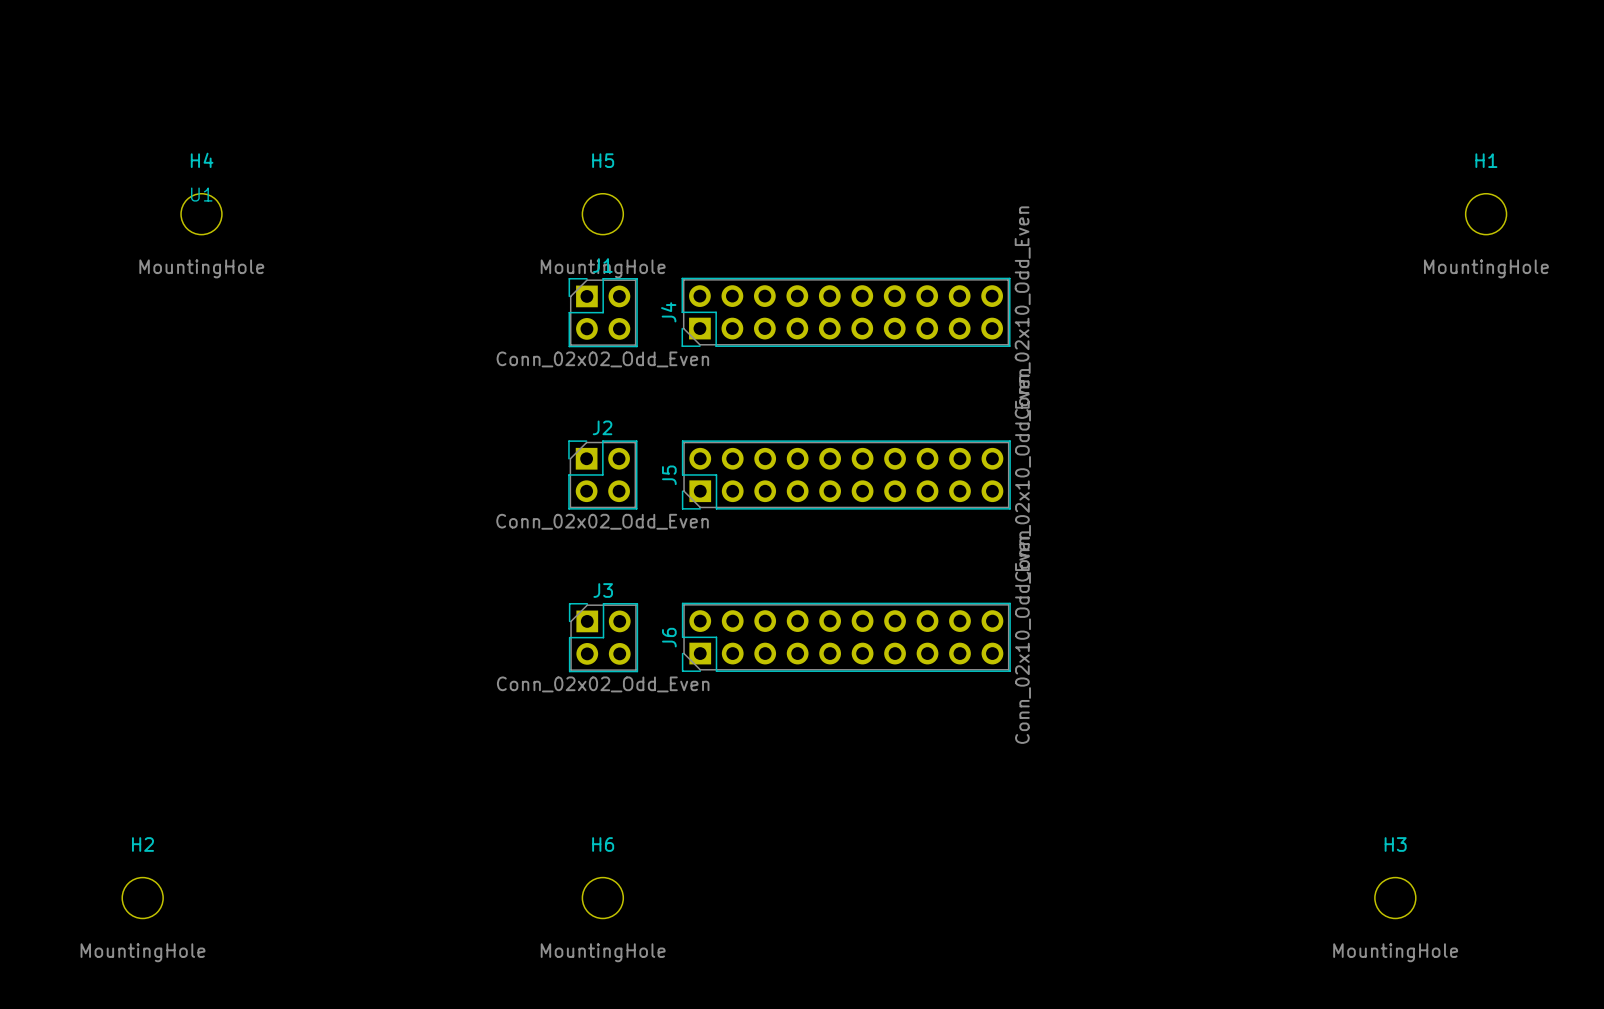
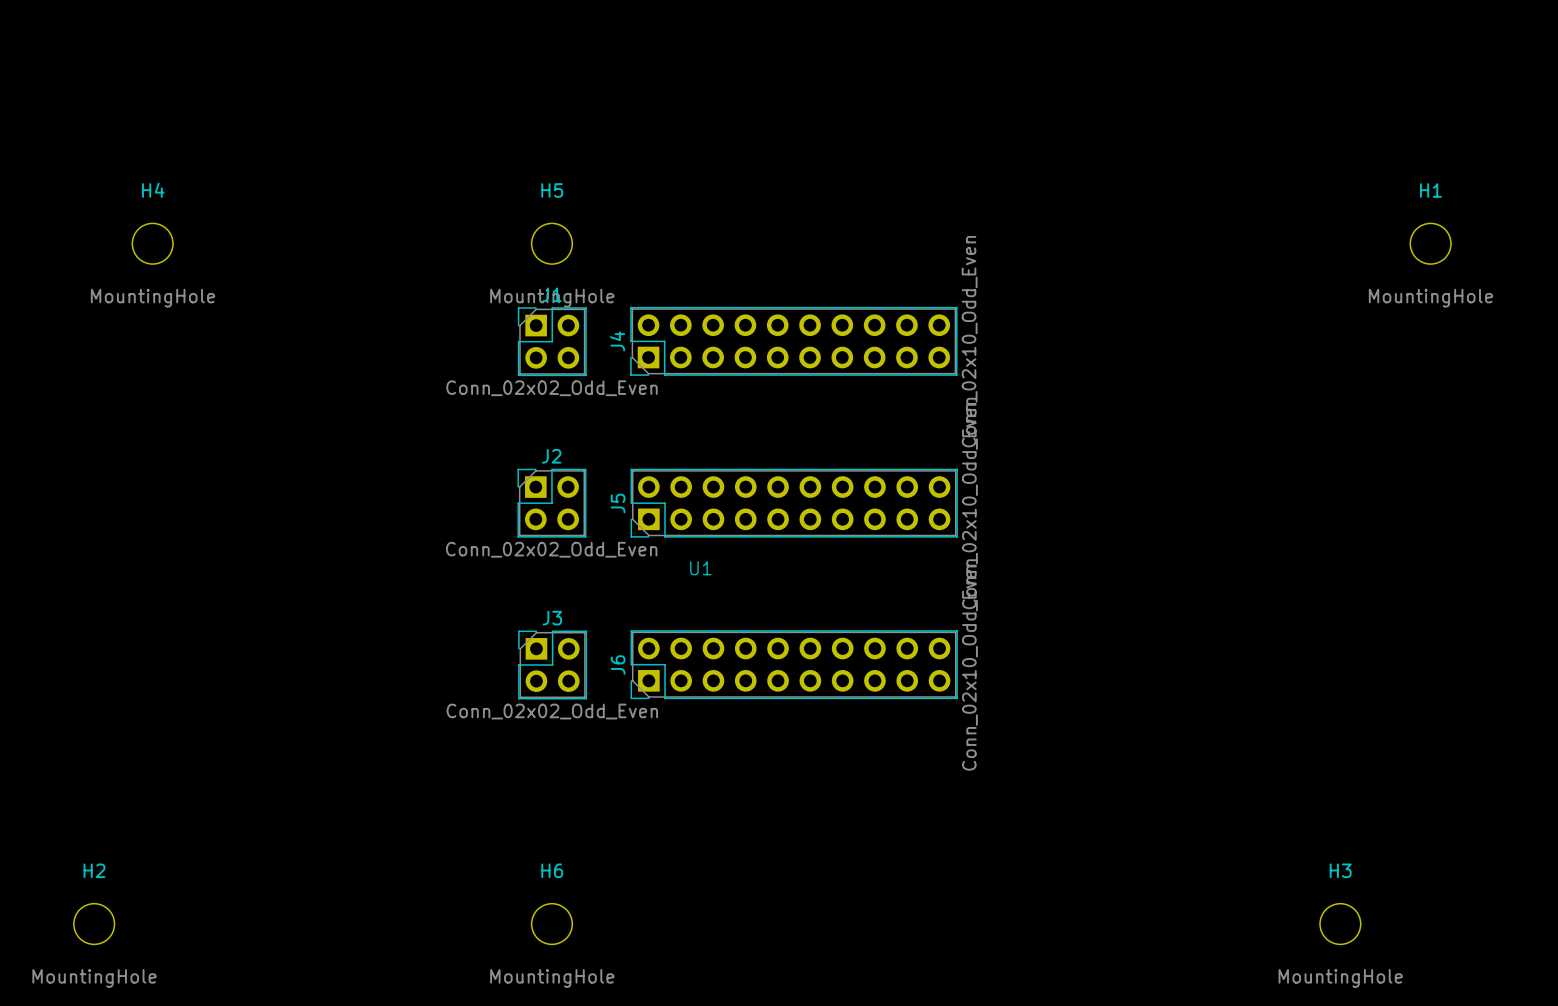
U1 position: (201, 194) -> (700, 568)

